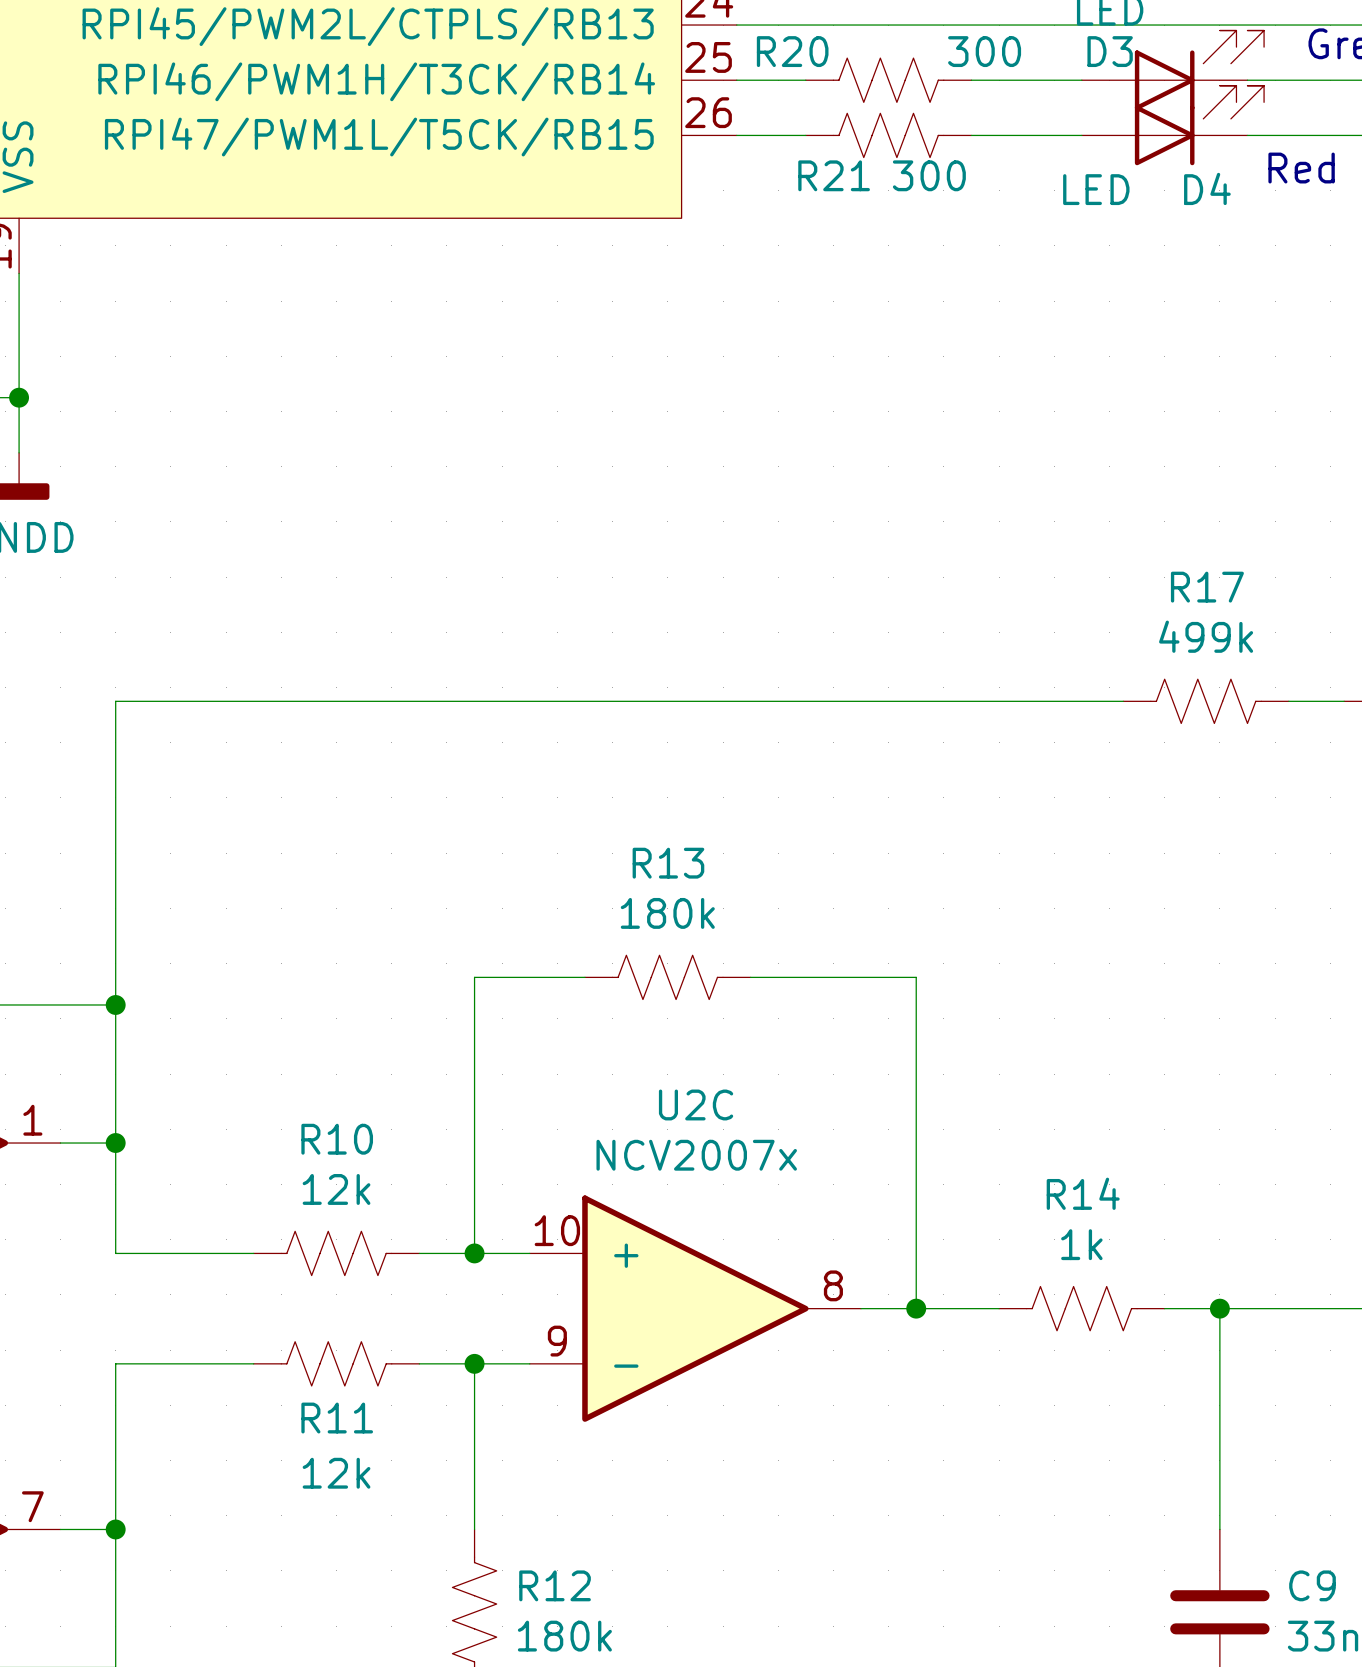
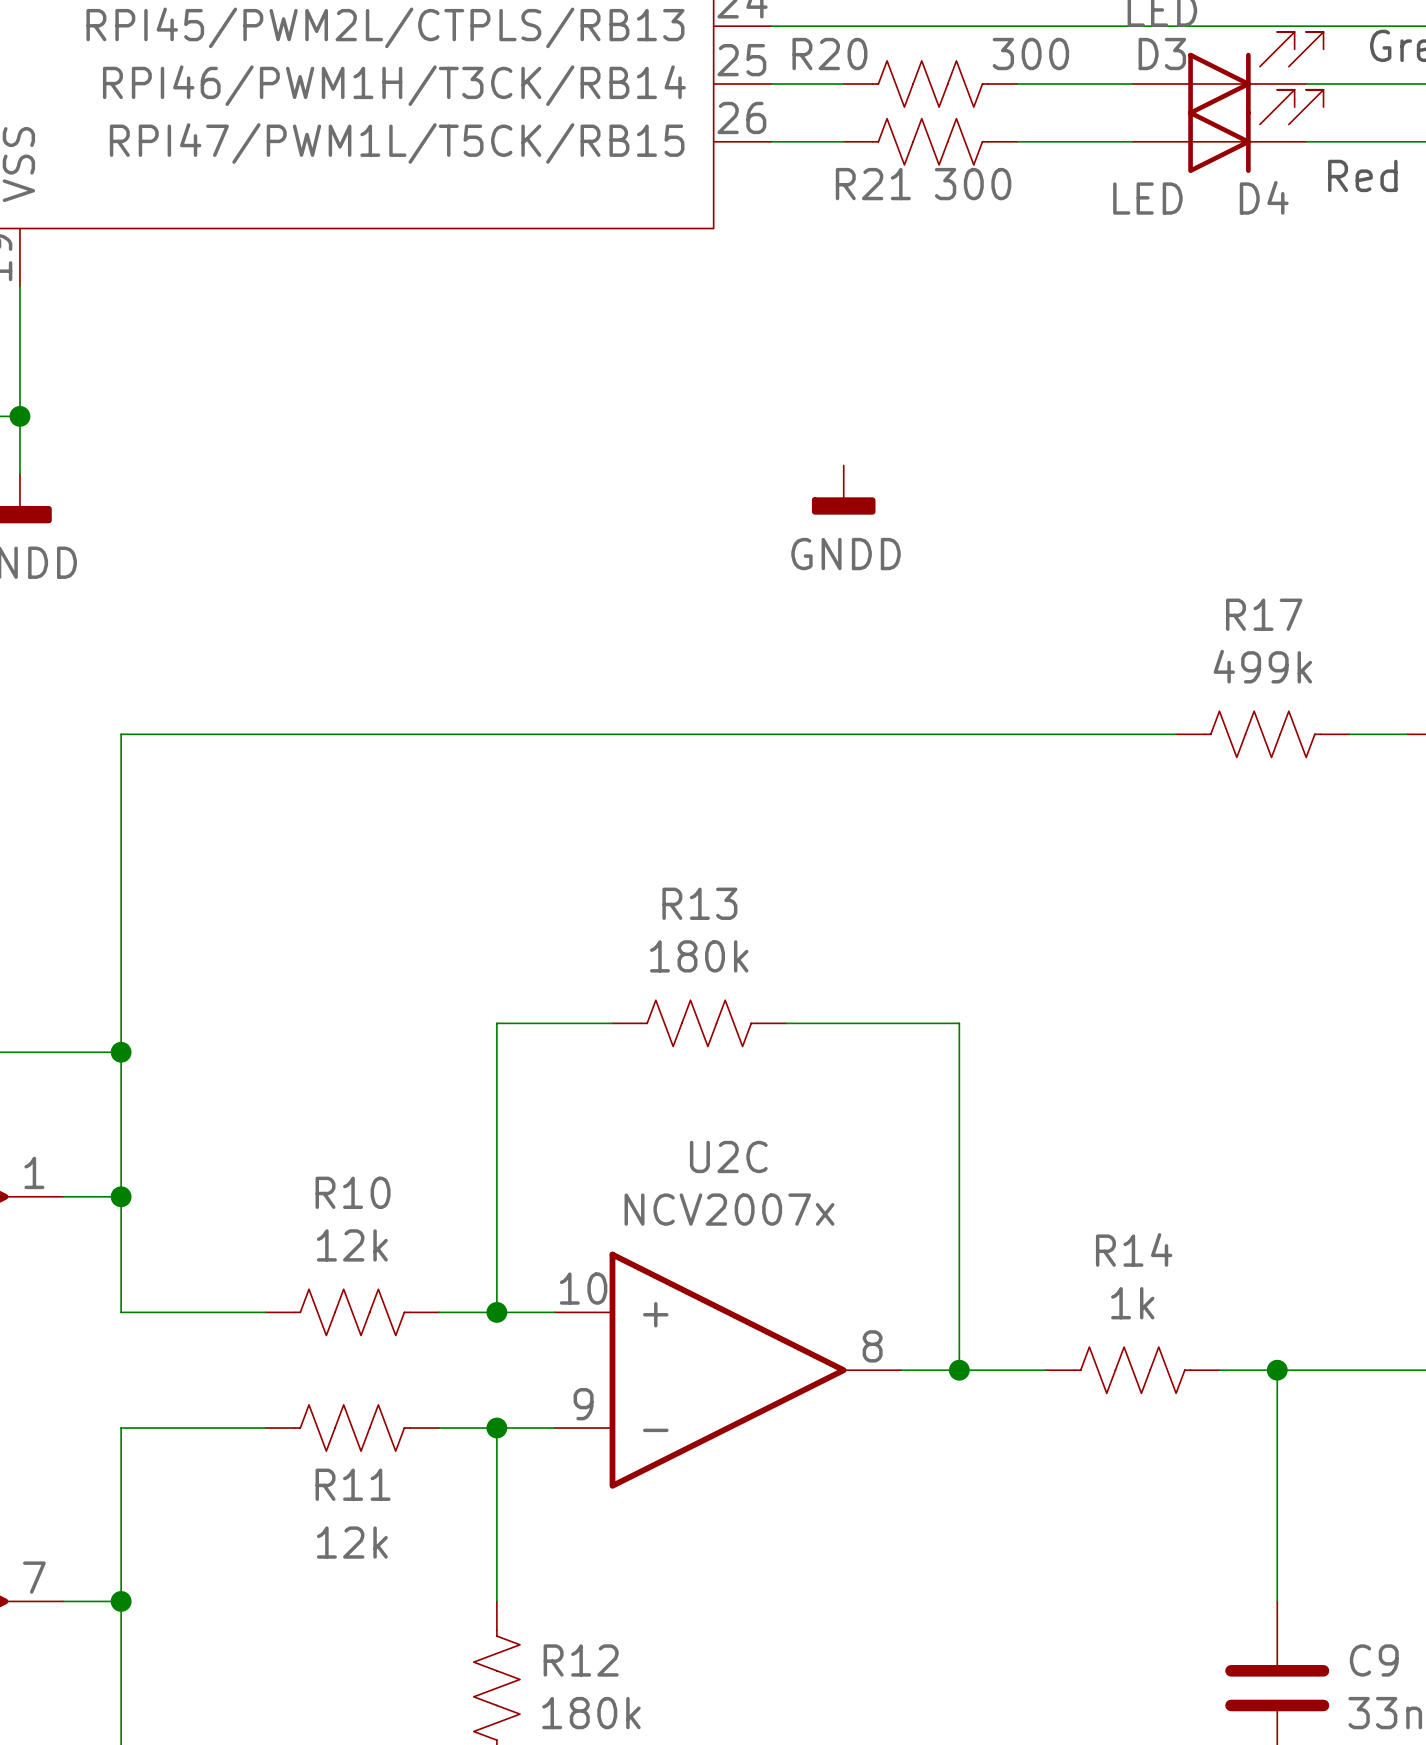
power symbol: none -> GNDD (843, 490)

